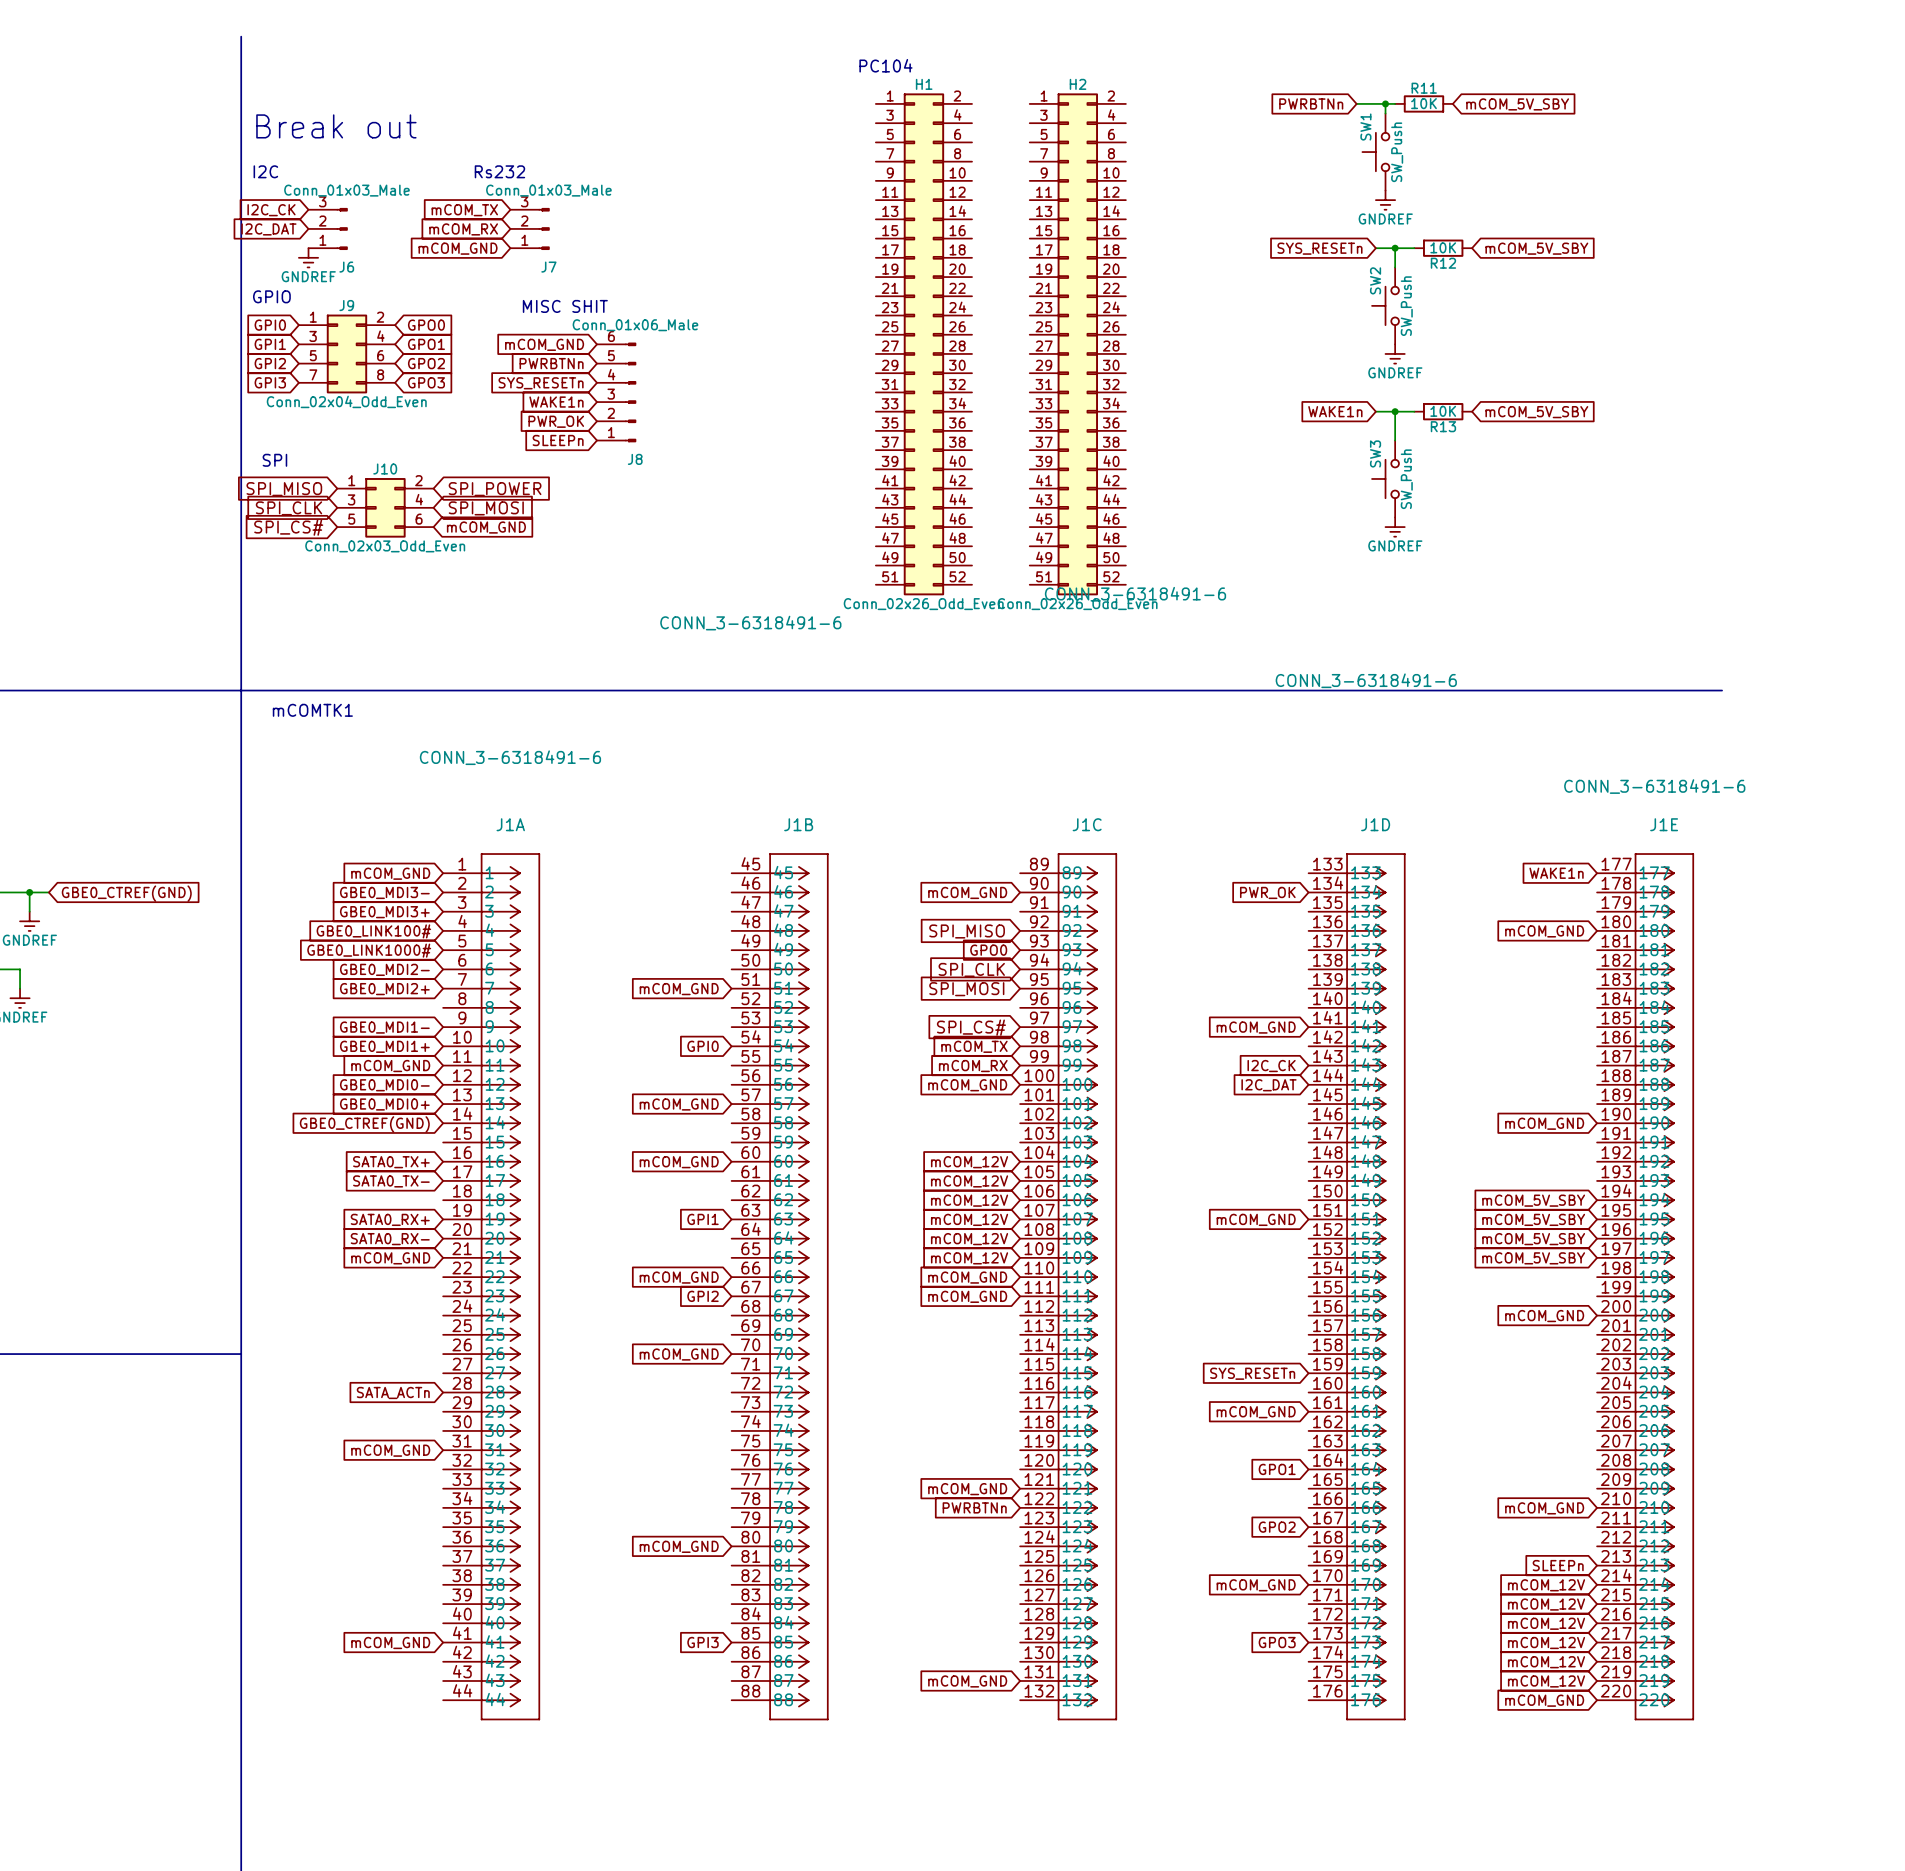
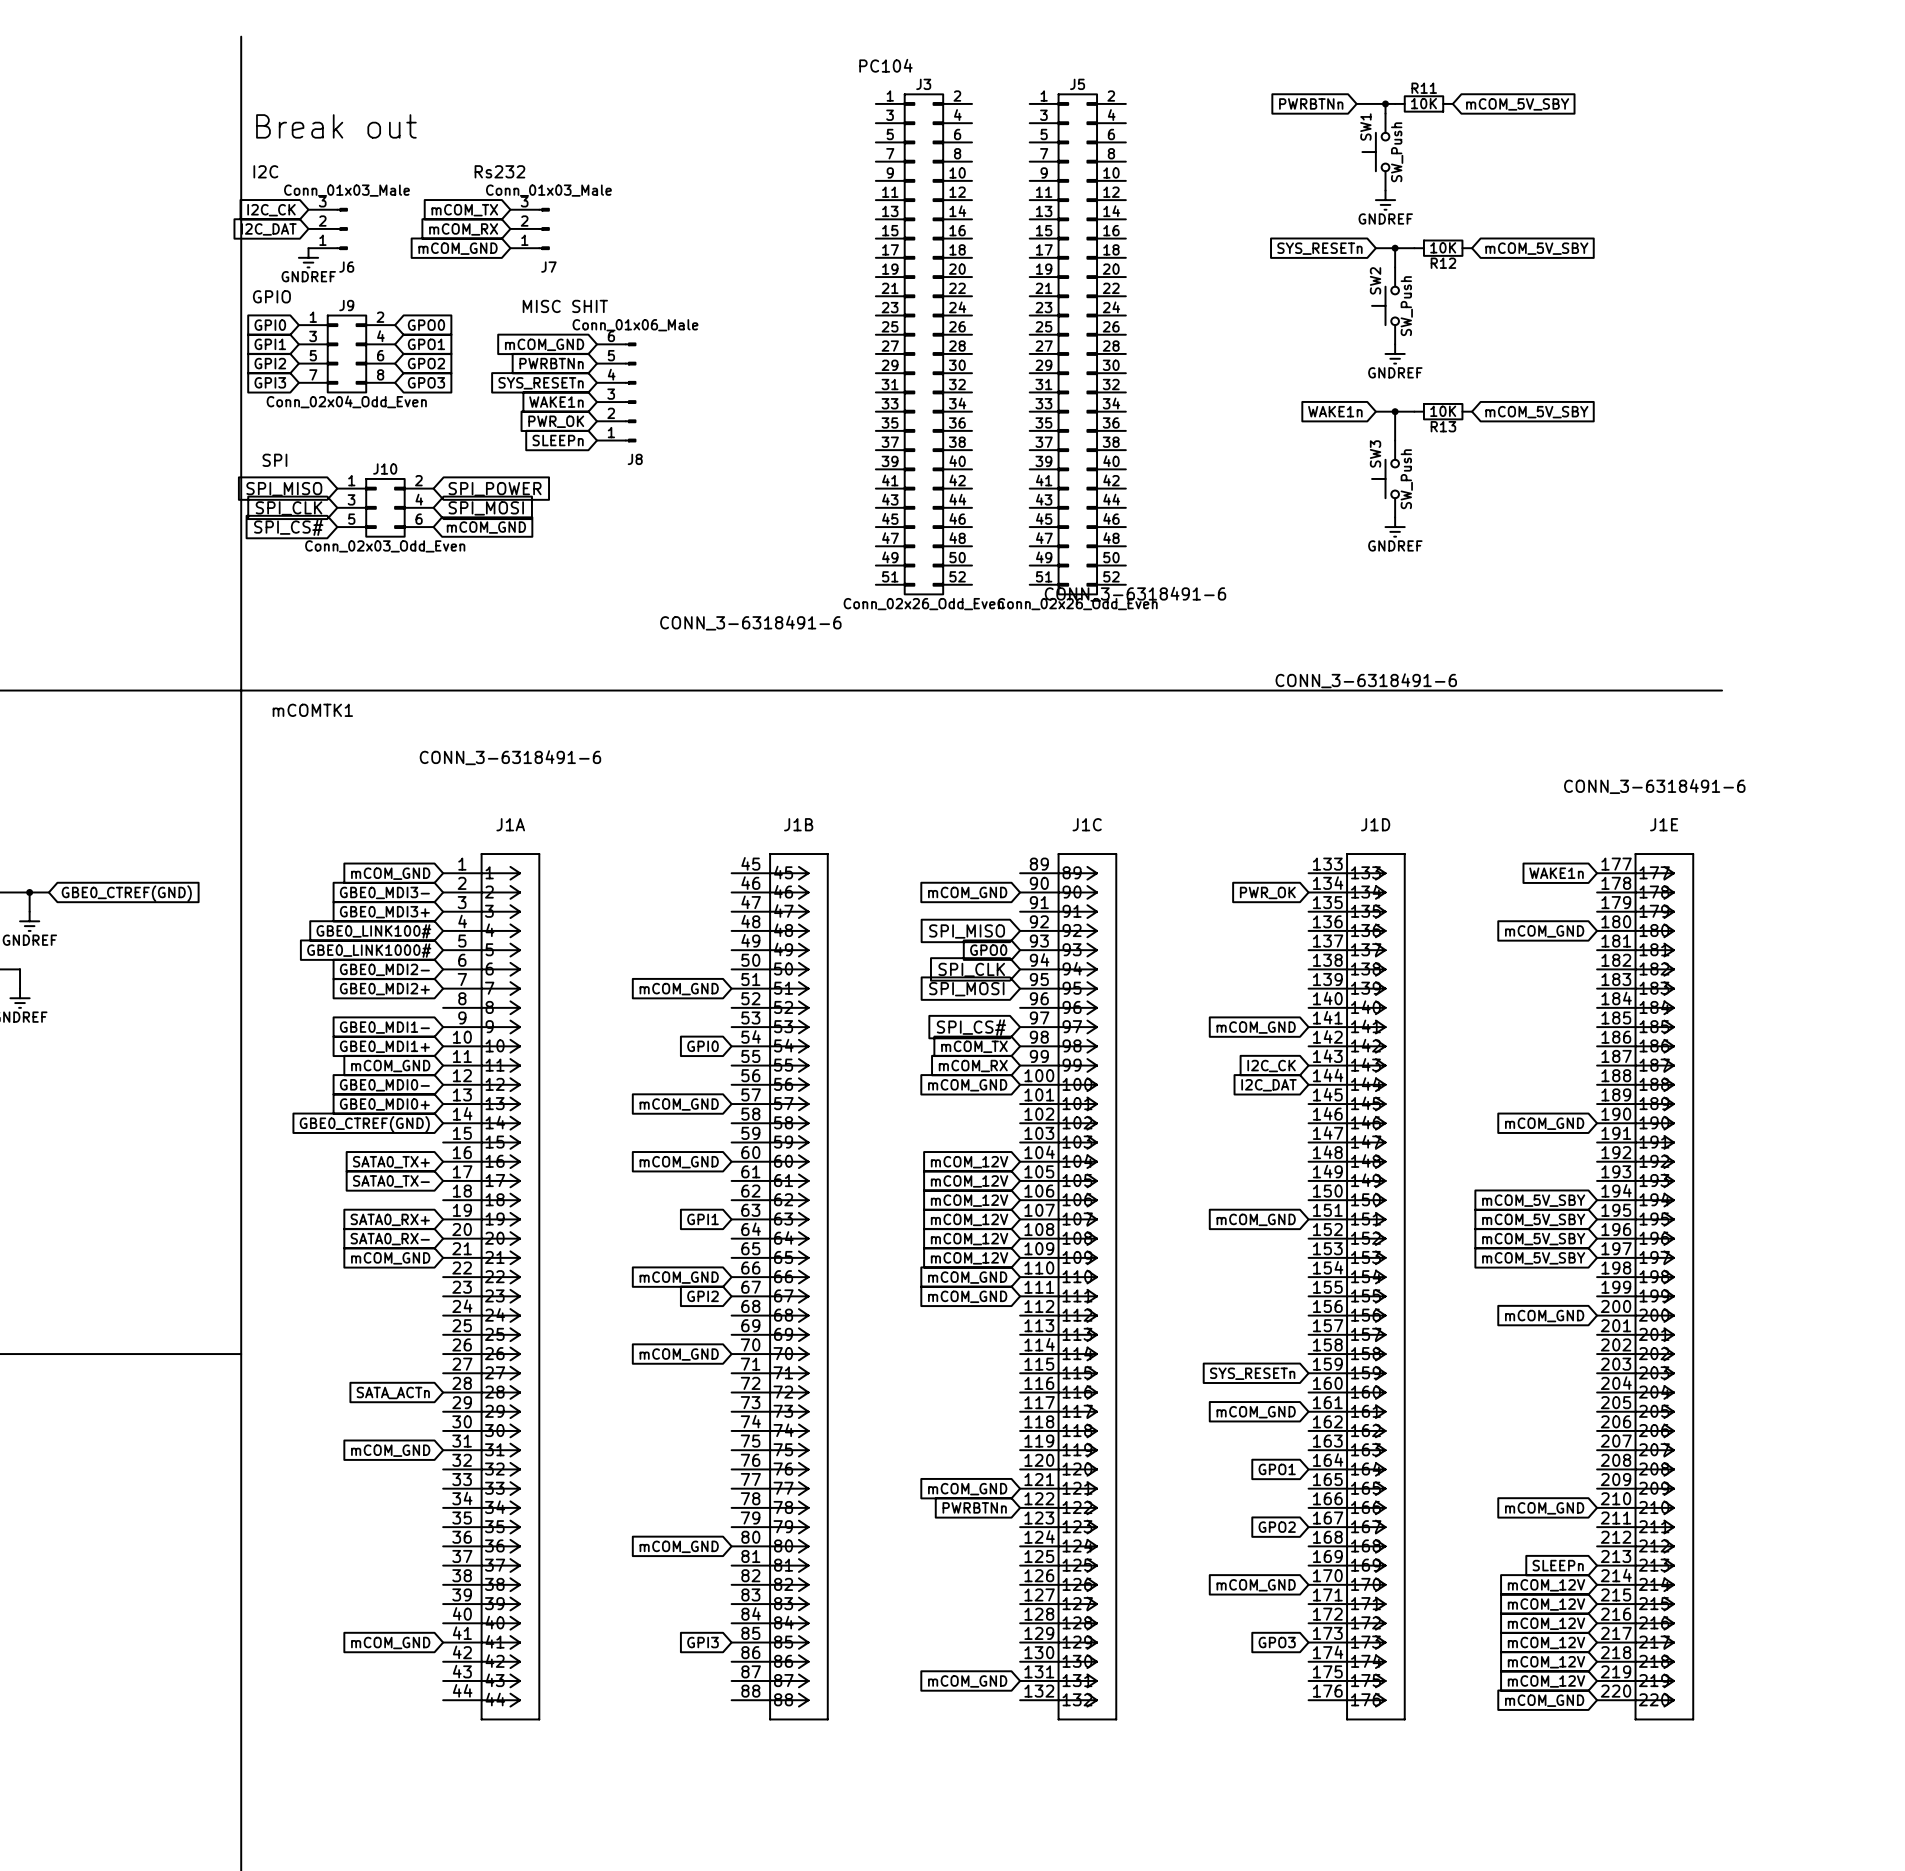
H1 name: H1 (924, 84) -> J3 (923, 84)
H2 name: H2 (1078, 84) -> J5 (1077, 84)

